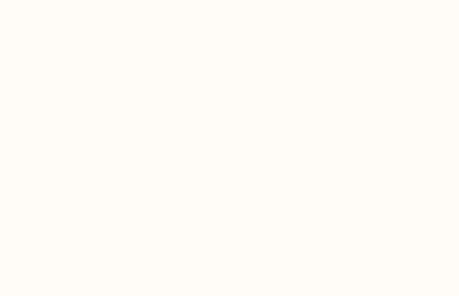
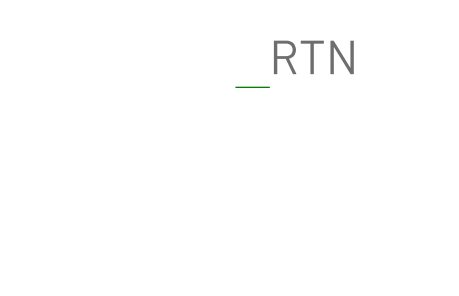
label: none -> RTN (313, 57)
wire: none -> (235, 87) (269, 87)

